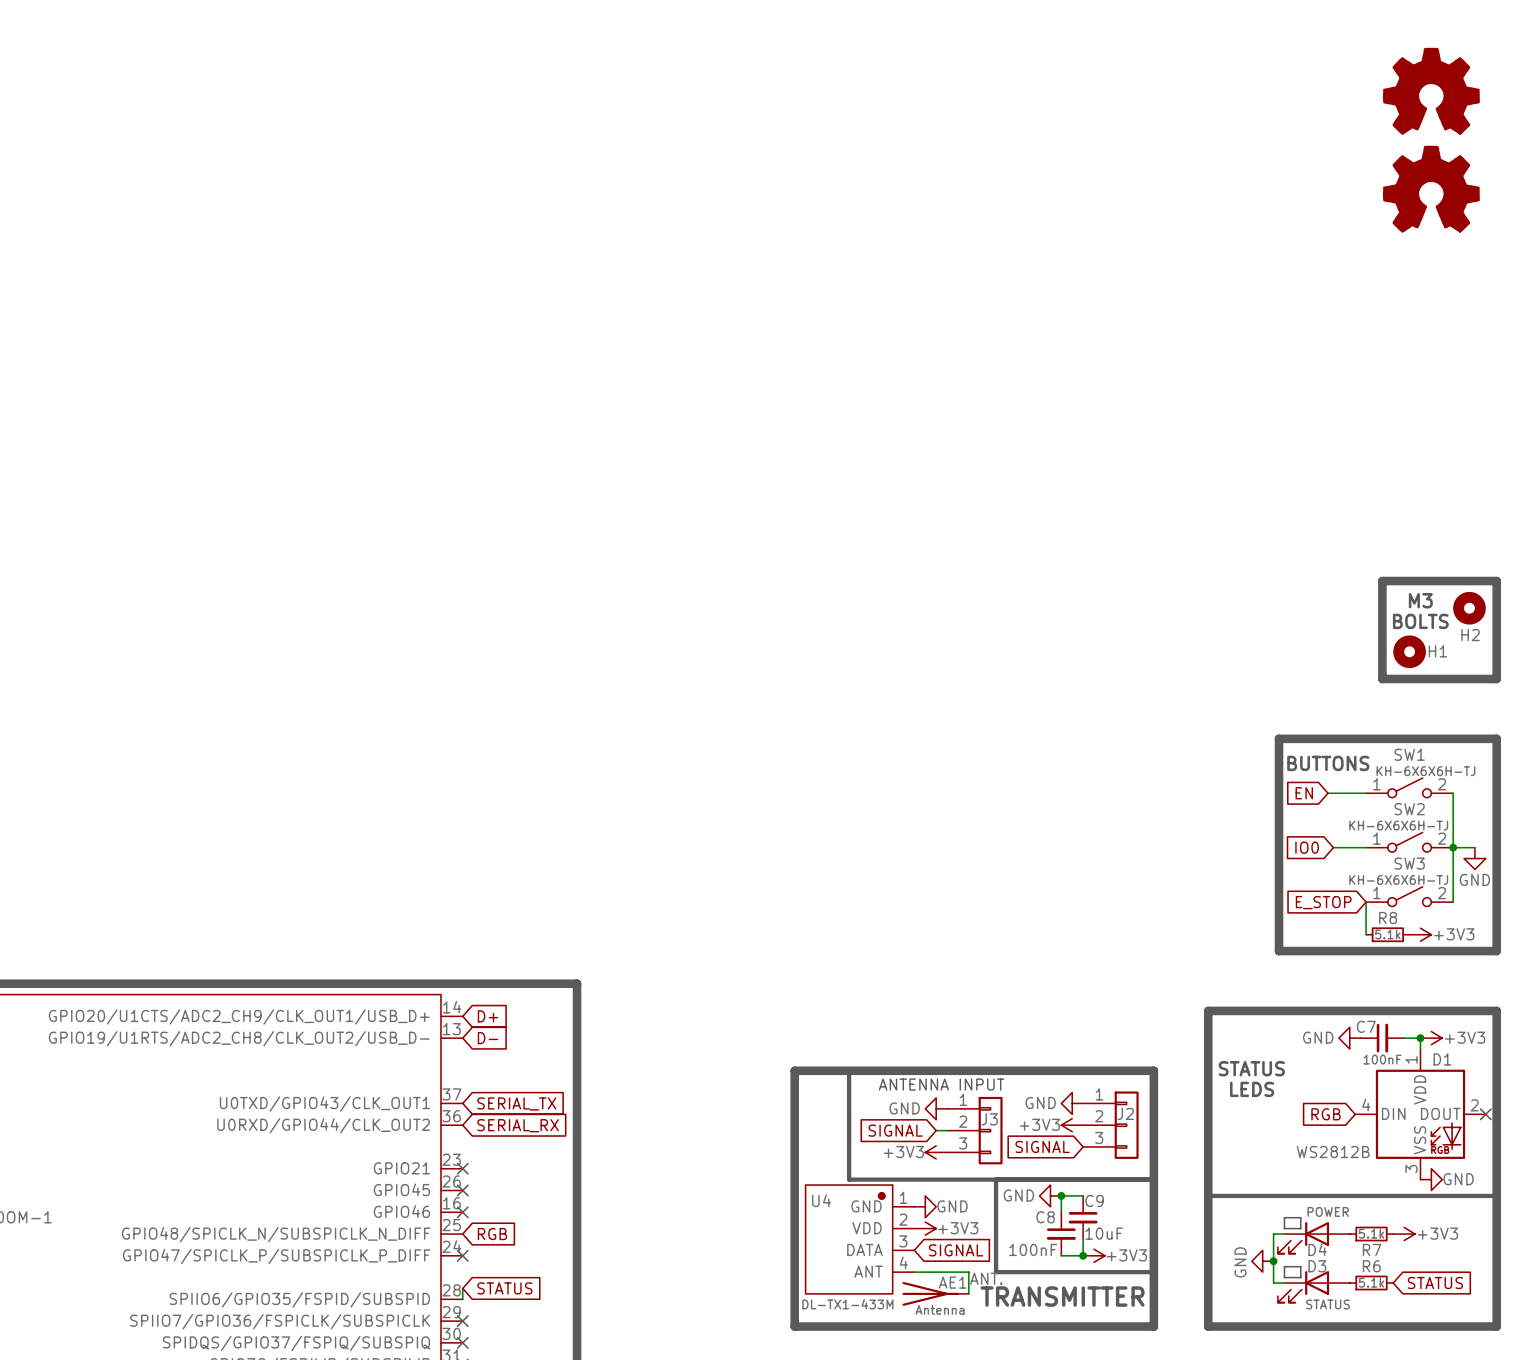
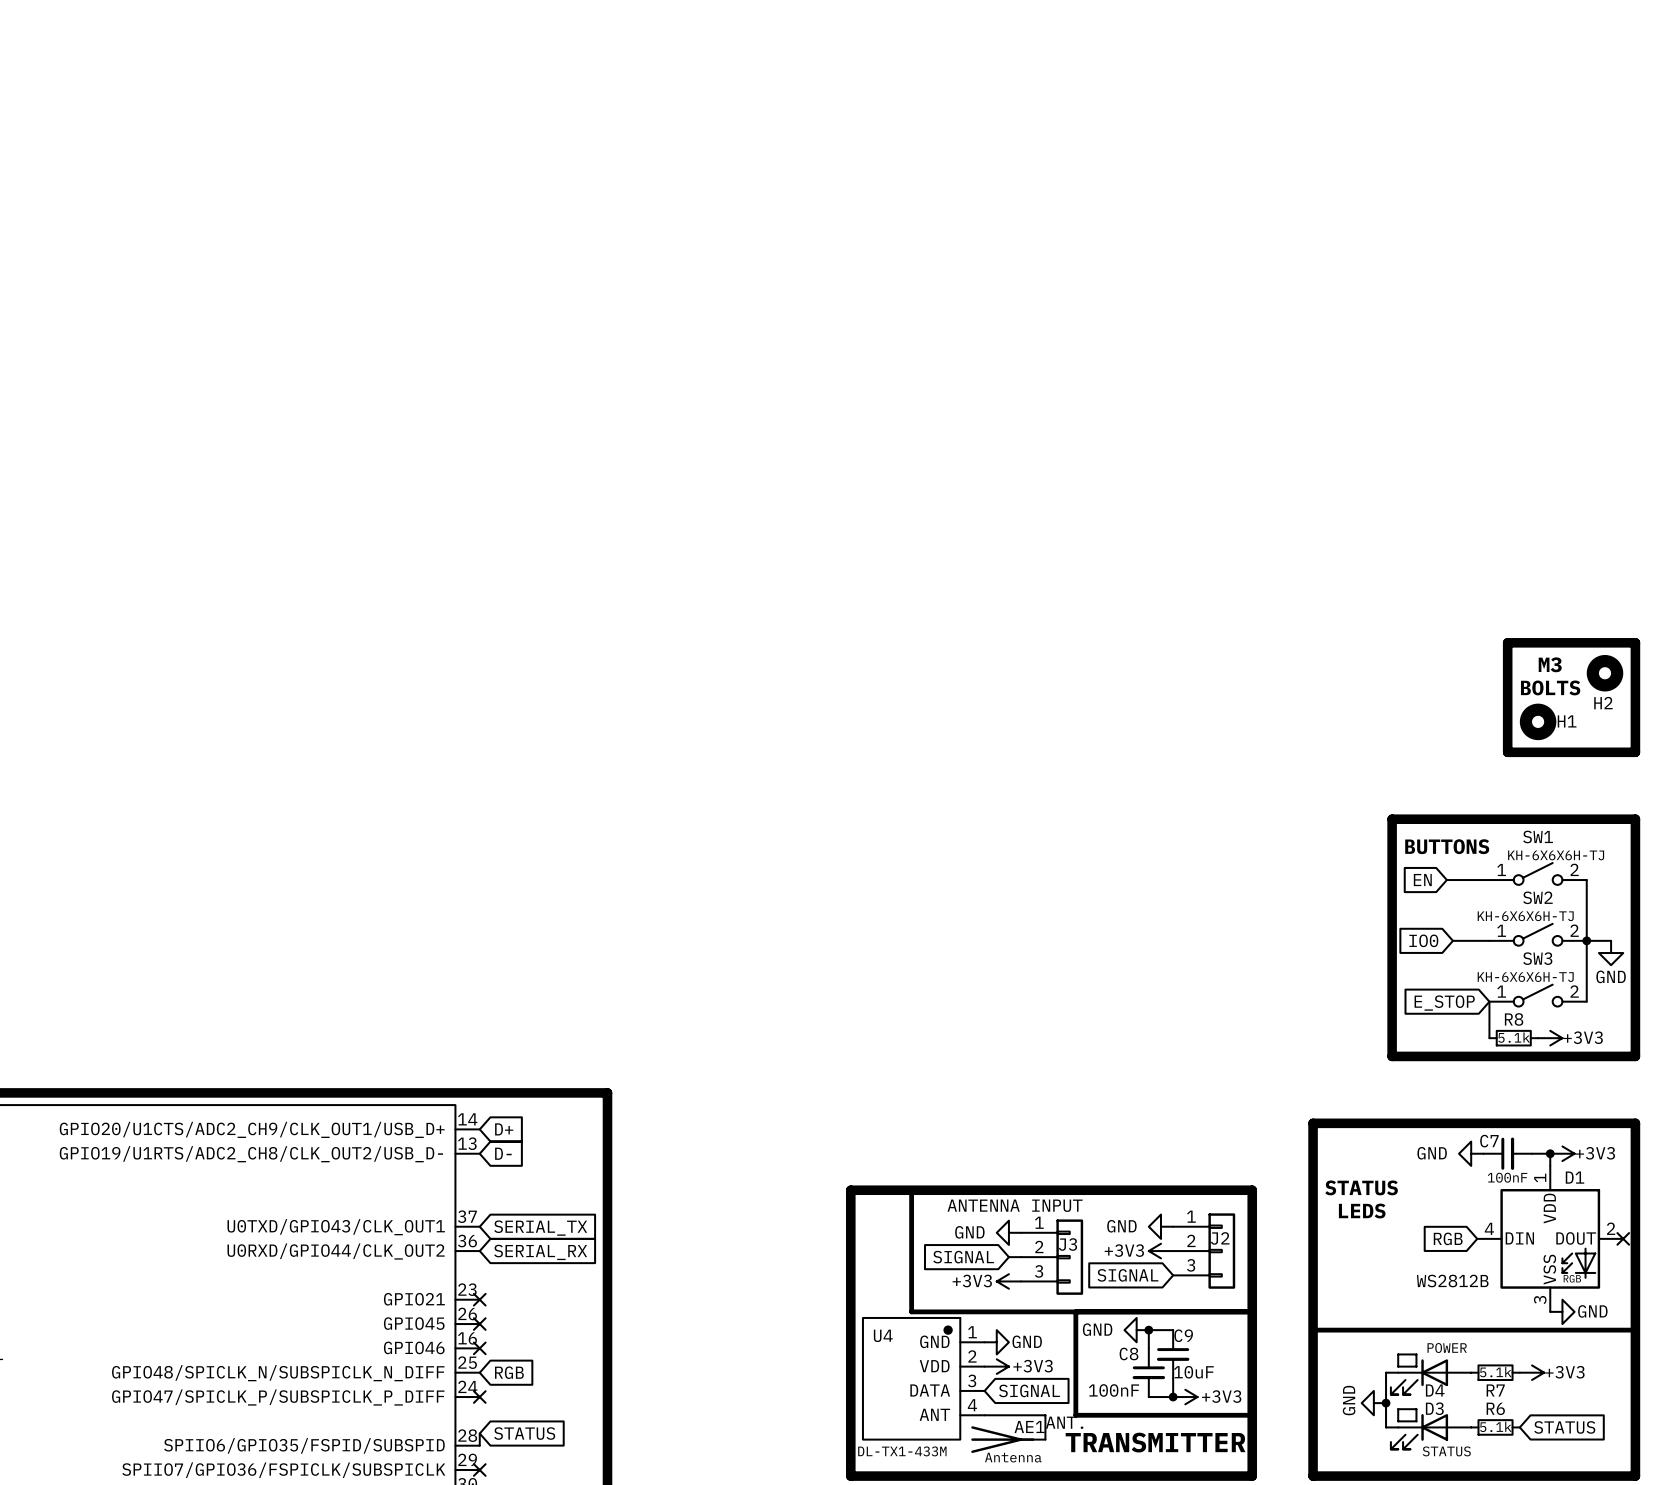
power symbol: (1431, 91) -> none
power symbol: (1431, 189) -> none

